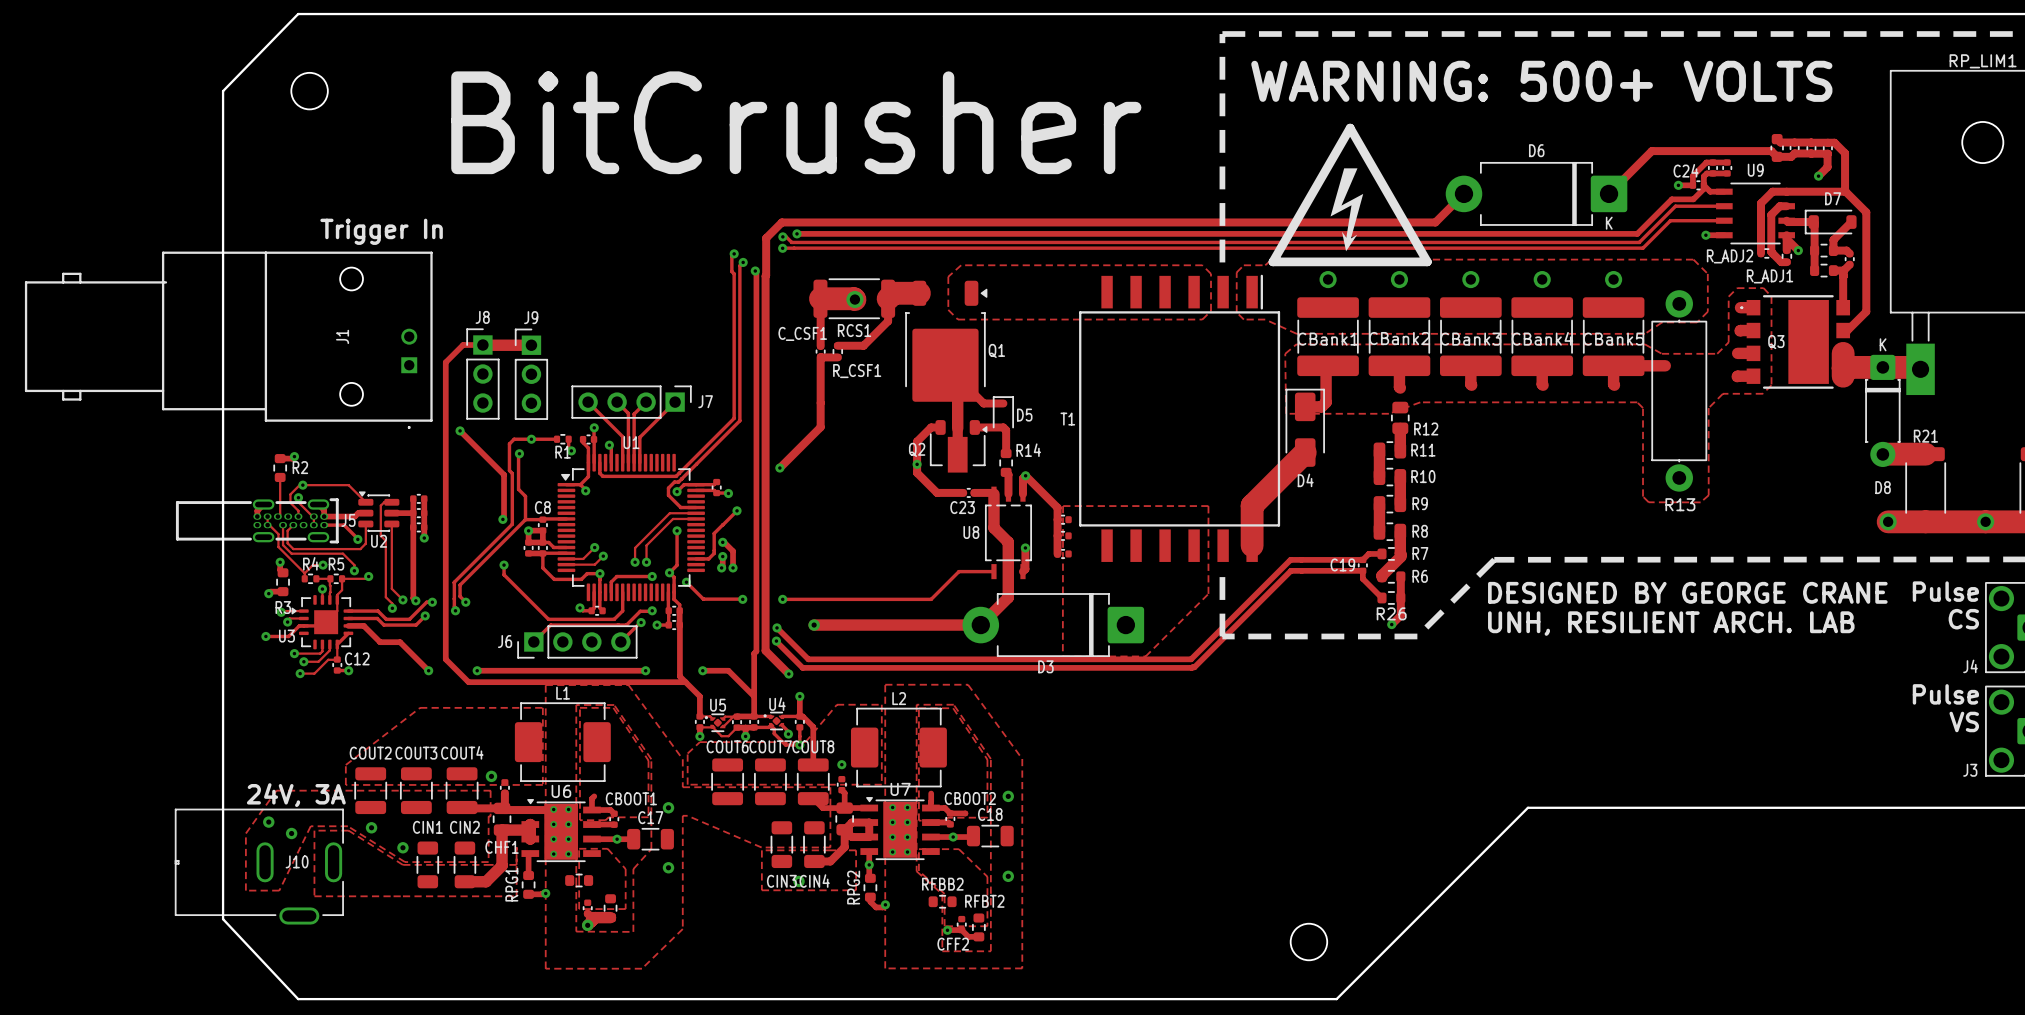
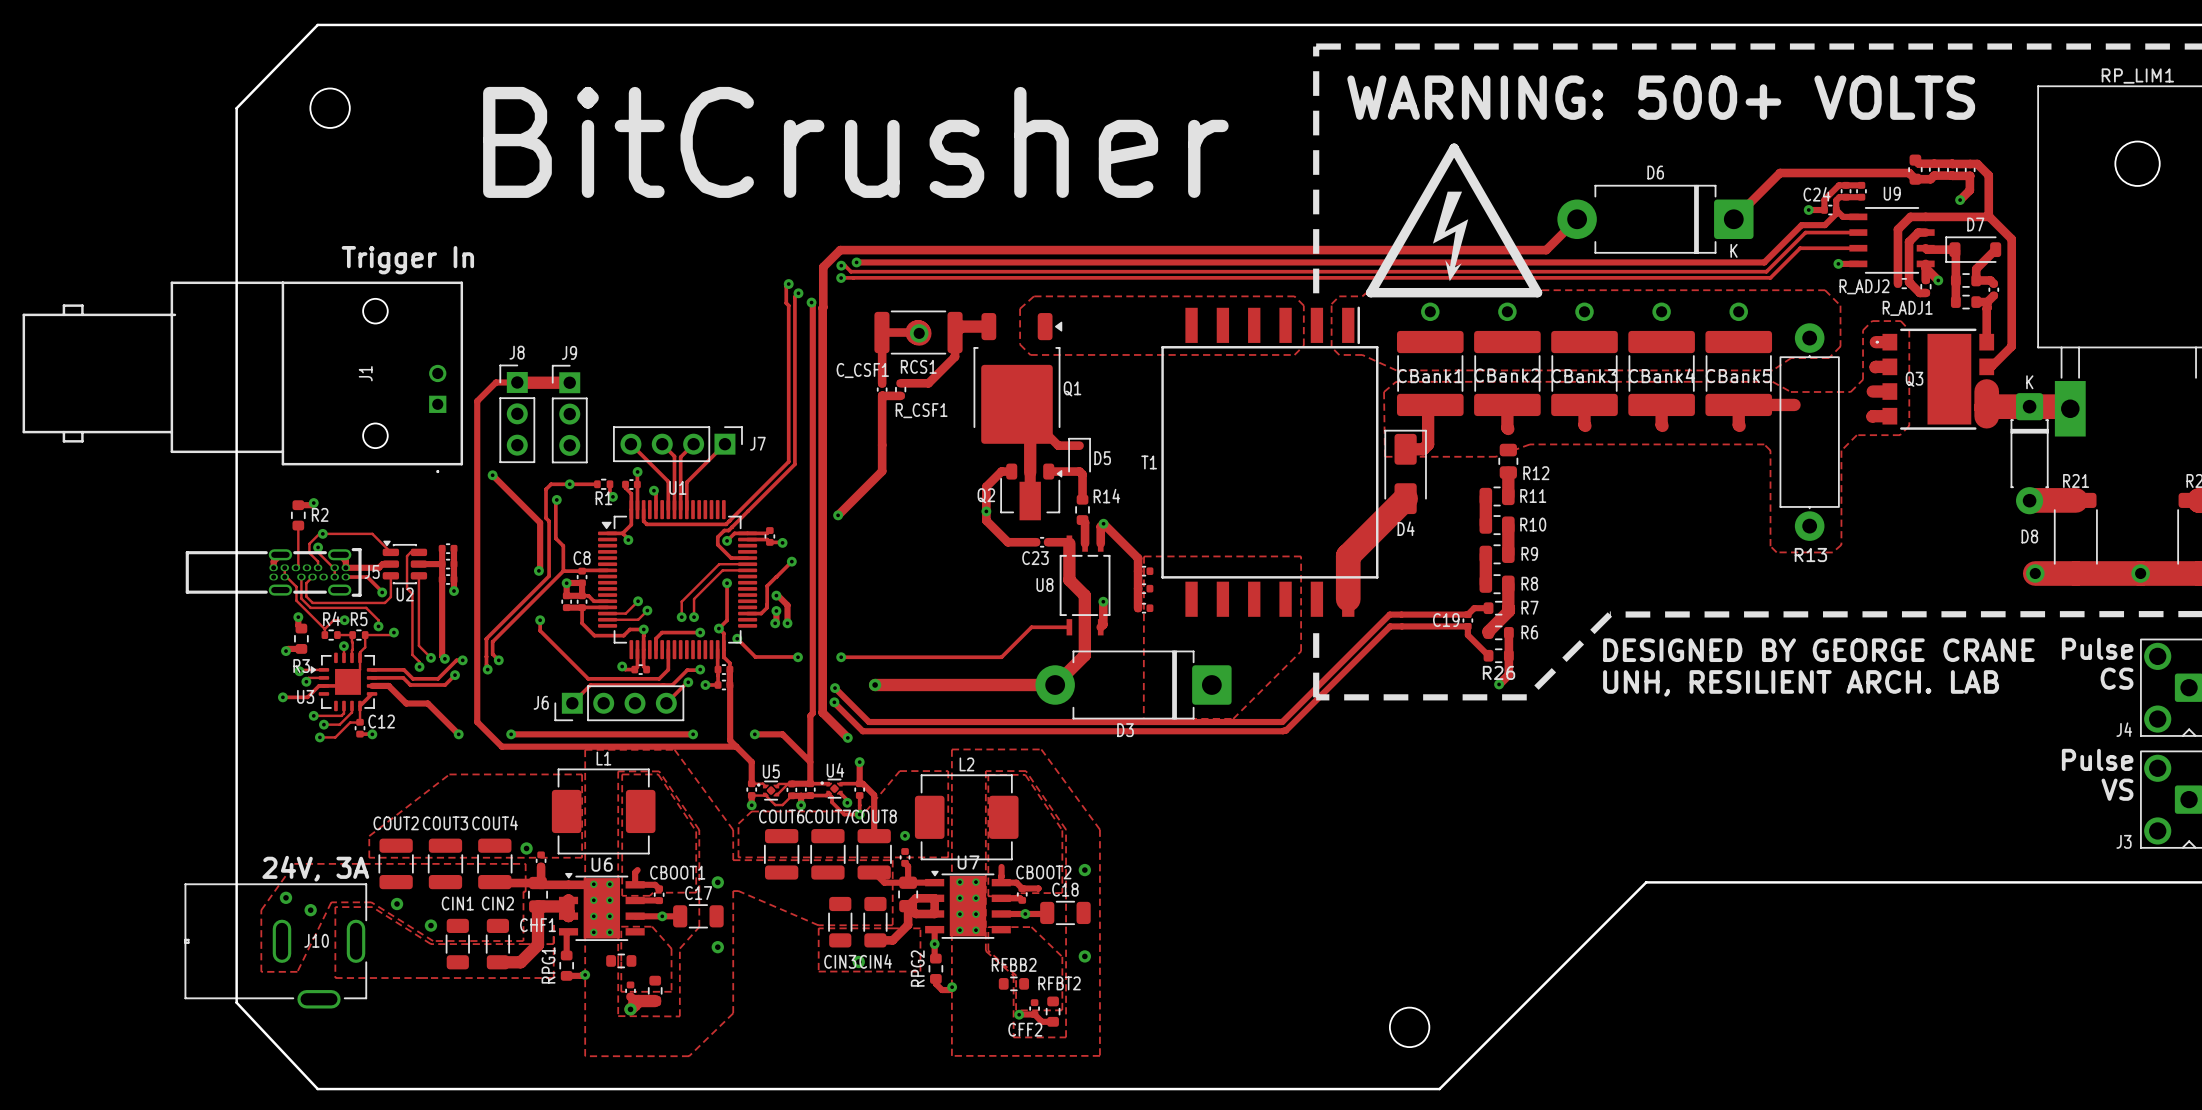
track width: thick (919, 293) (893, 293) (888, 298) -> thin (988, 326) (960, 326) (955, 332)
track width: thick (820, 298) (853, 298) -> thin (881, 332) (917, 332)

